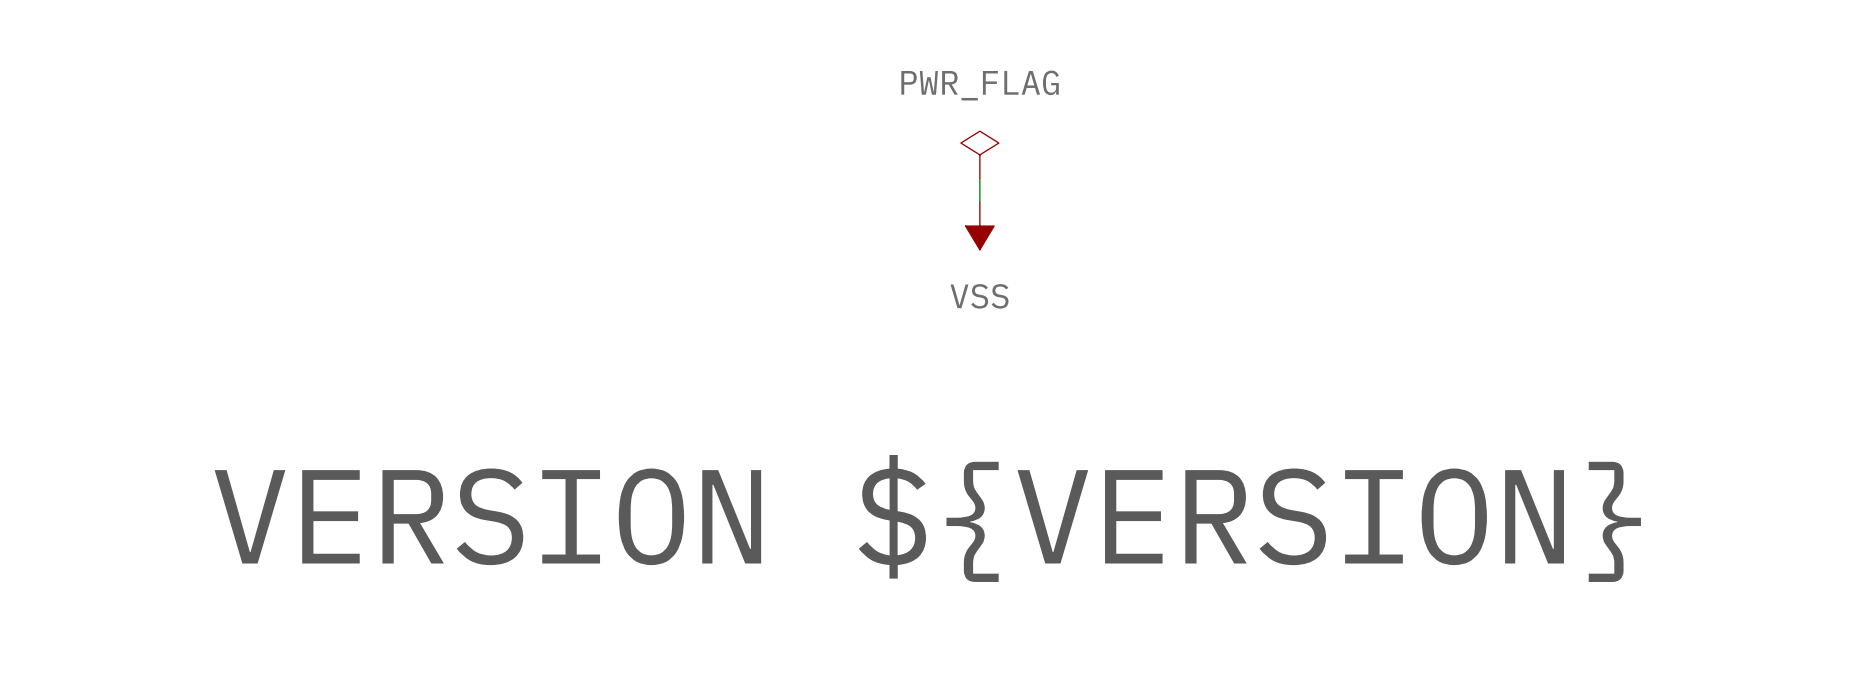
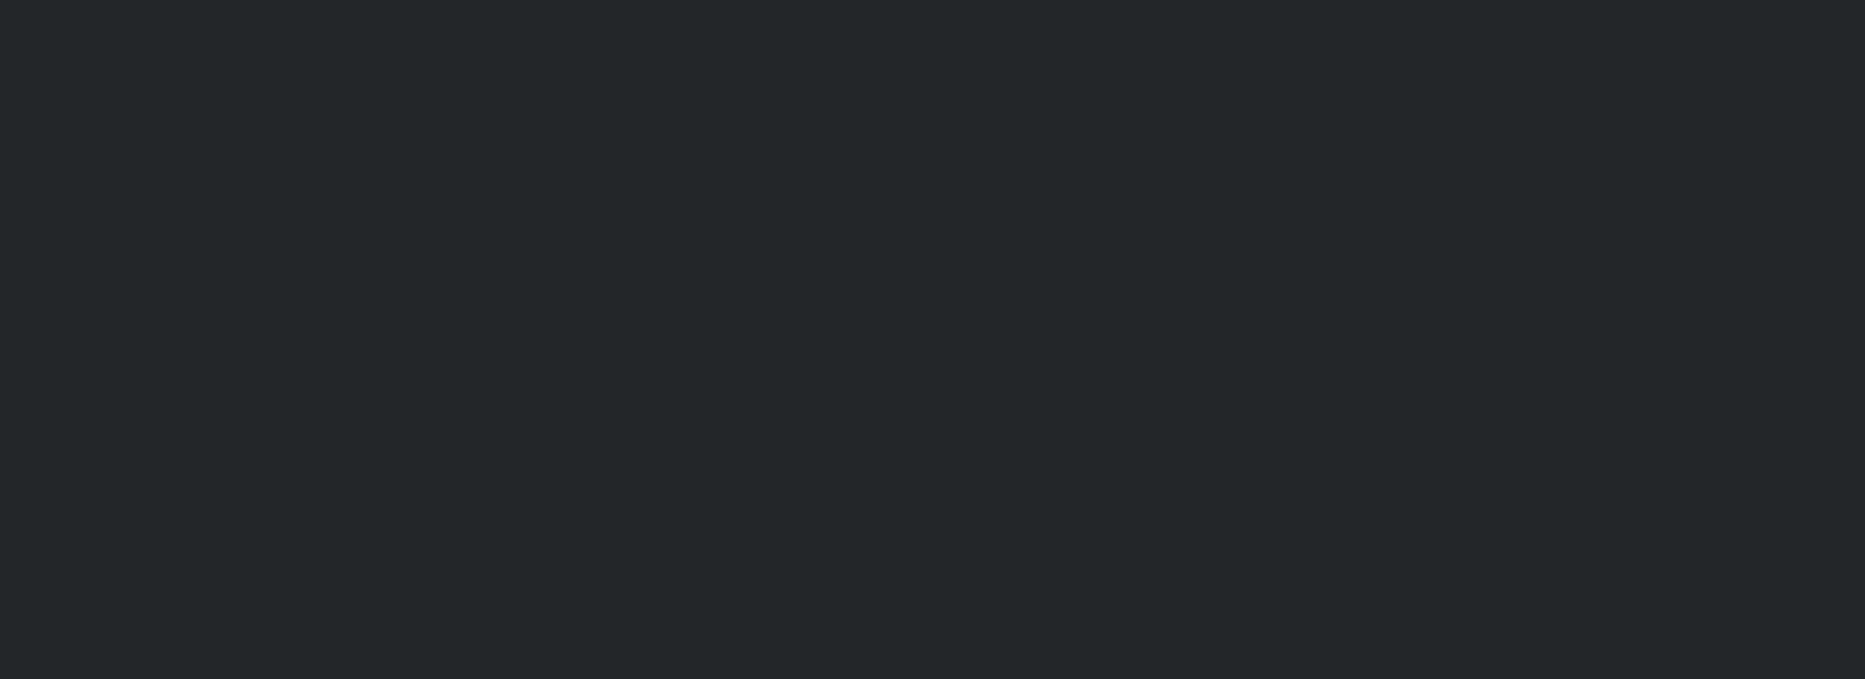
power symbol: PWR_FLAG (979, 154) -> none
wire: (979, 178) (979, 202) -> none
power symbol: VSS (979, 226) -> none
text: VERSION ${VERSION} (927, 518) -> none

